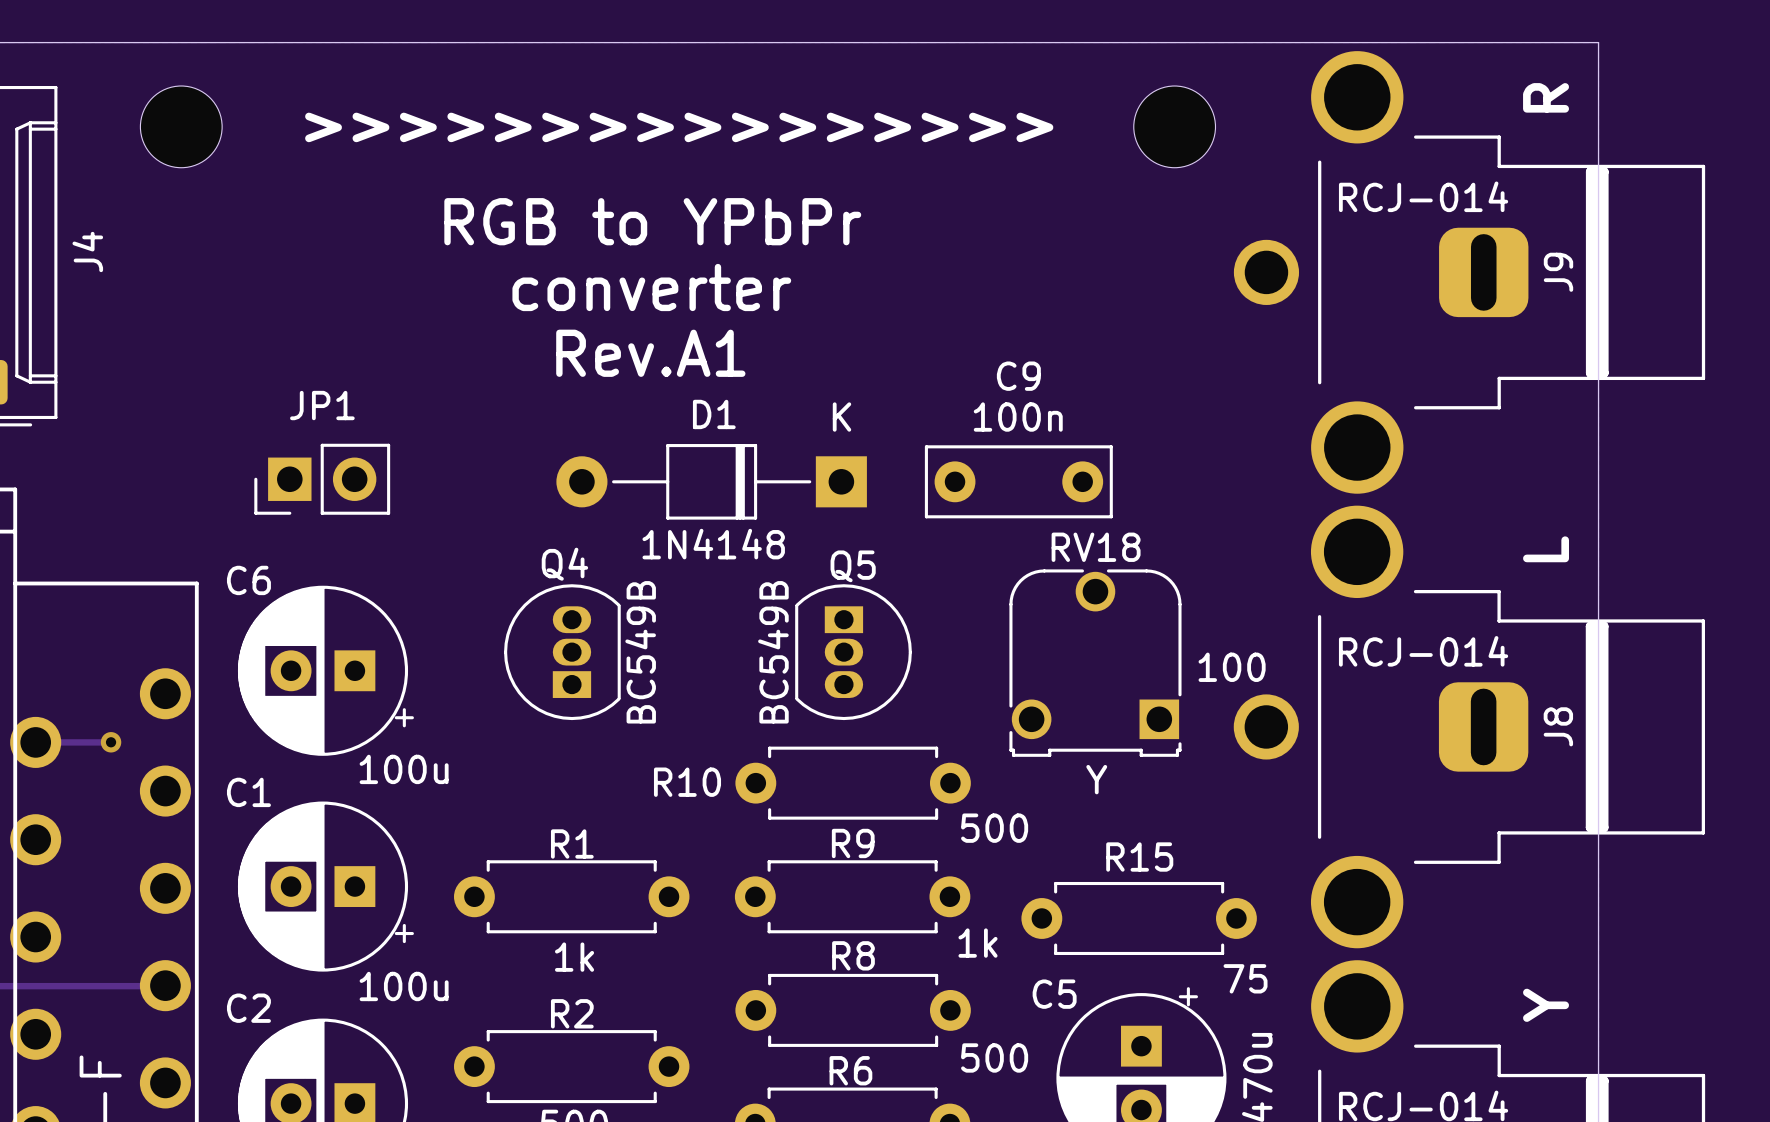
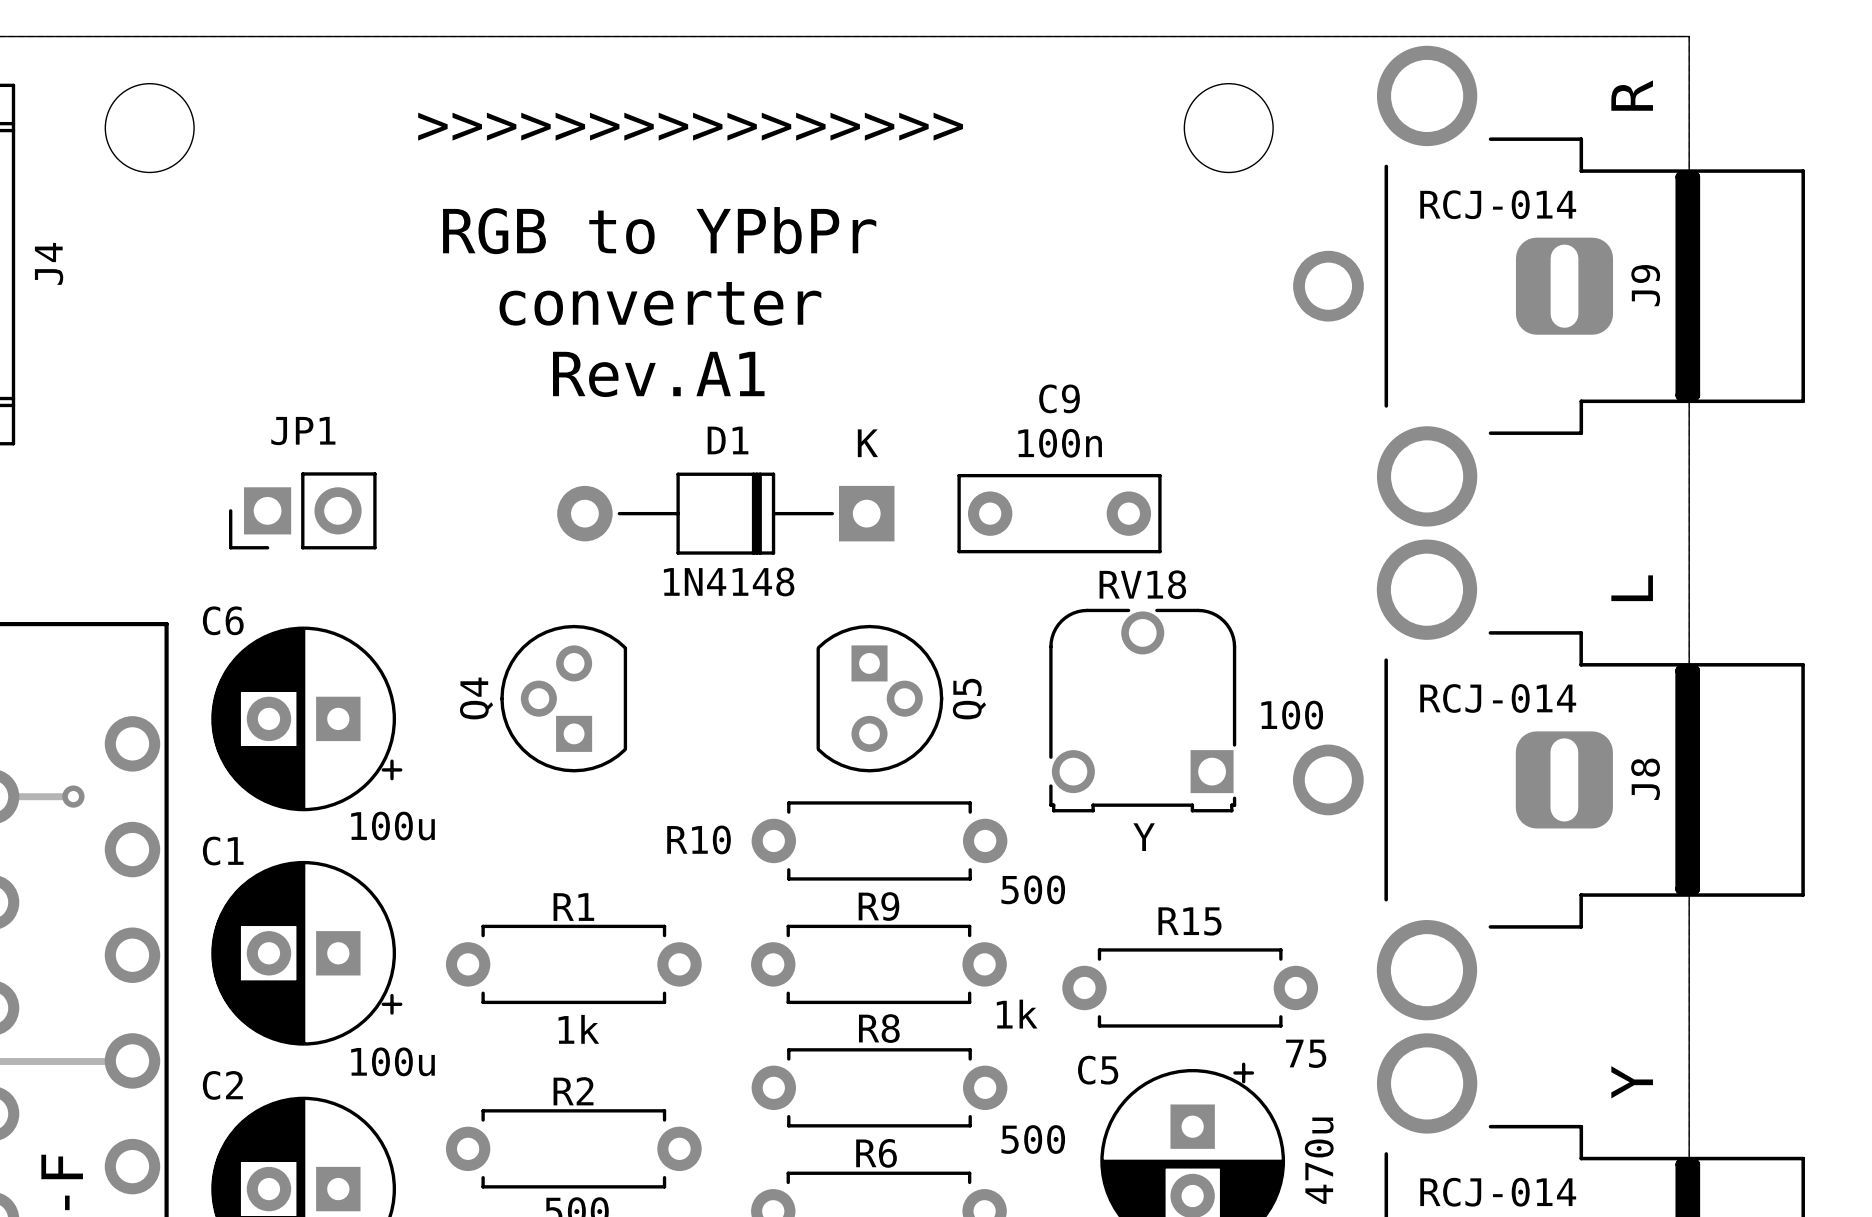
Q4 name position: Q4 (564, 564) -> Q4 (476, 698)
Q5 name position: Q5 (853, 566) -> Q5 (969, 699)
Q4 footprint: [504, 584, 621, 721] -> [500, 624, 628, 773]
Q5 footprint: [795, 584, 912, 721] -> [816, 624, 944, 773]
Q4 value: BC549B (640, 652) -> none
Q5 value: BC549B (773, 652) -> none

